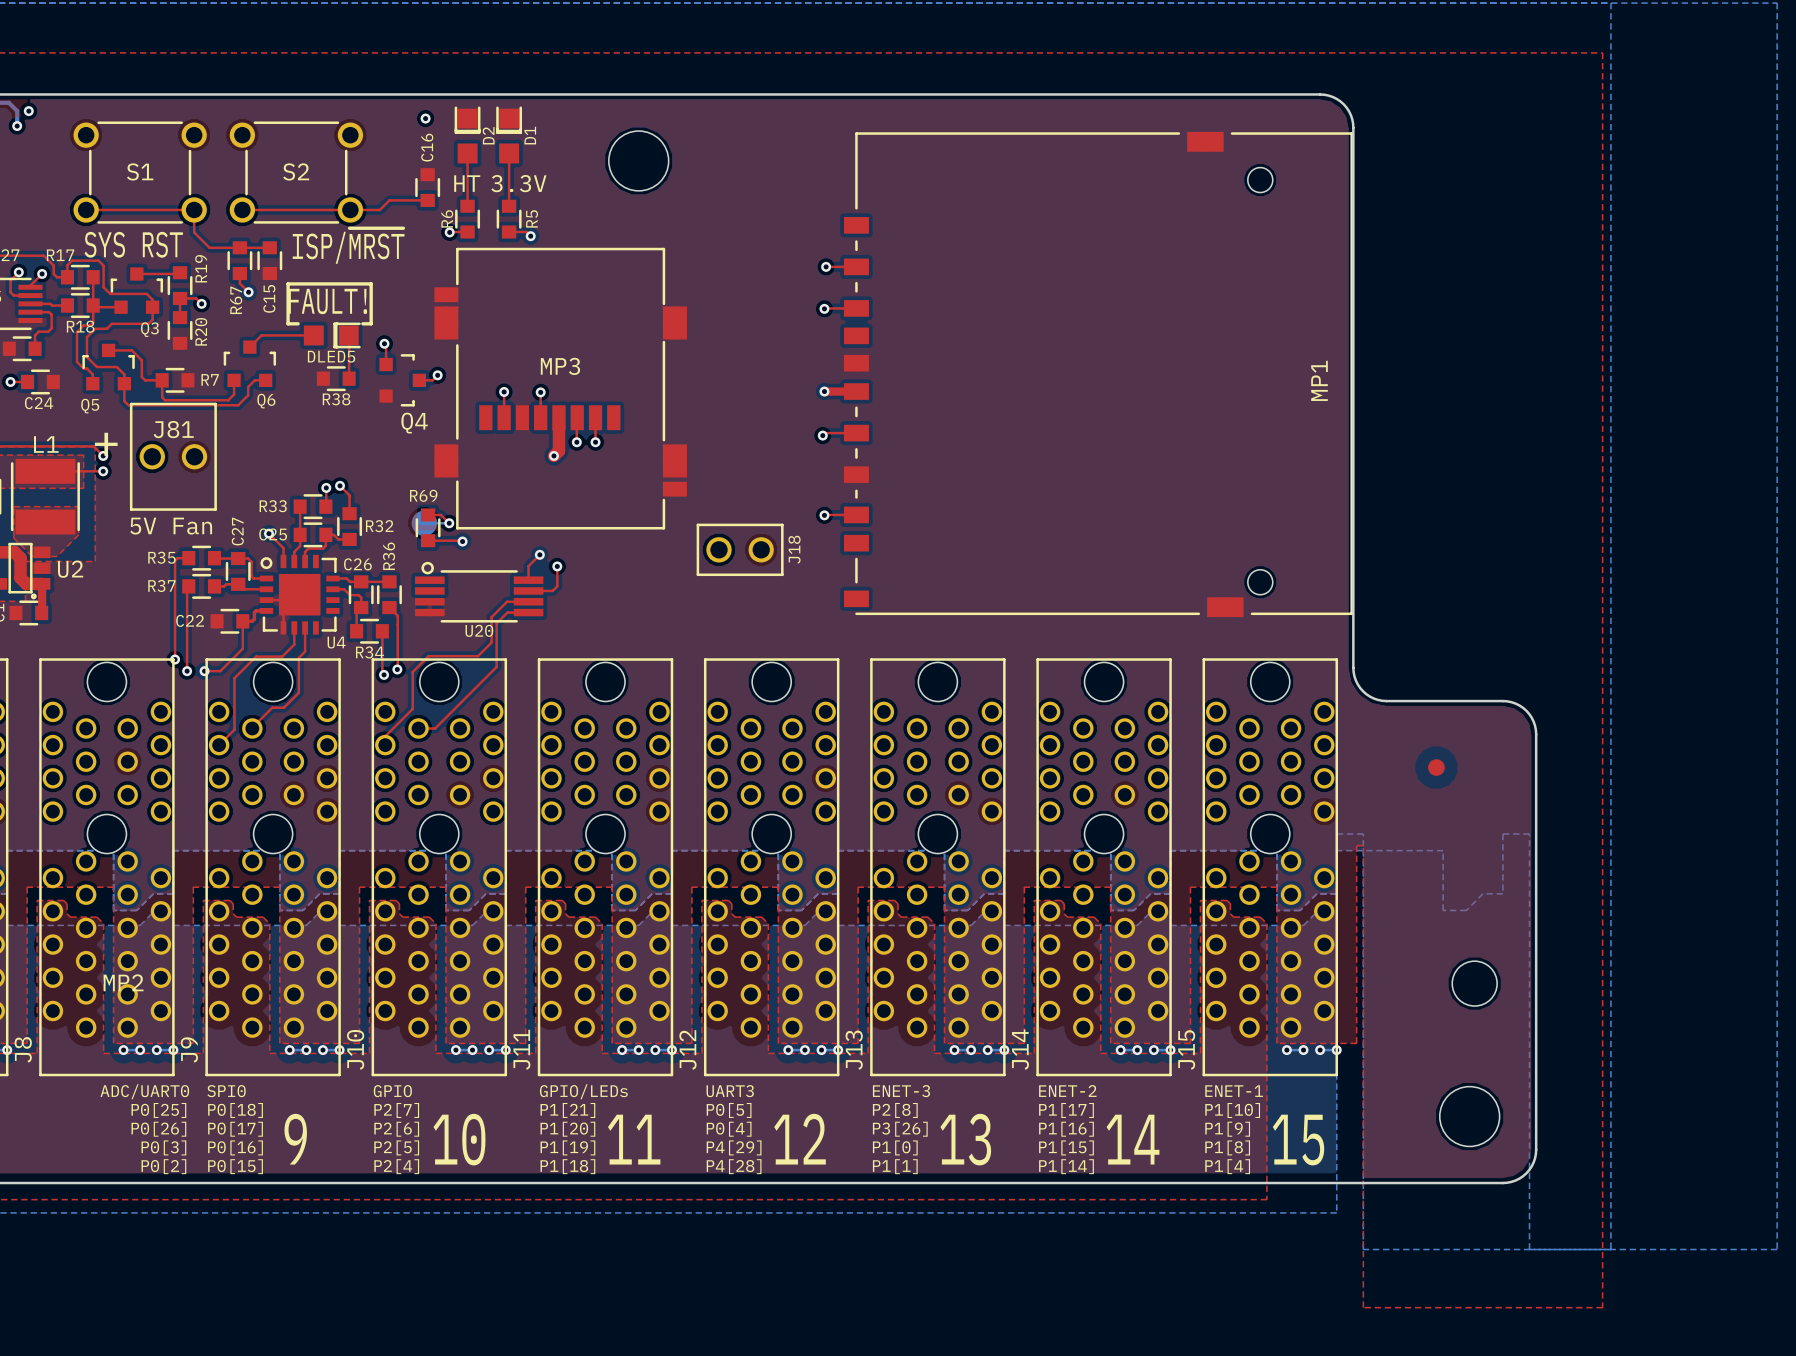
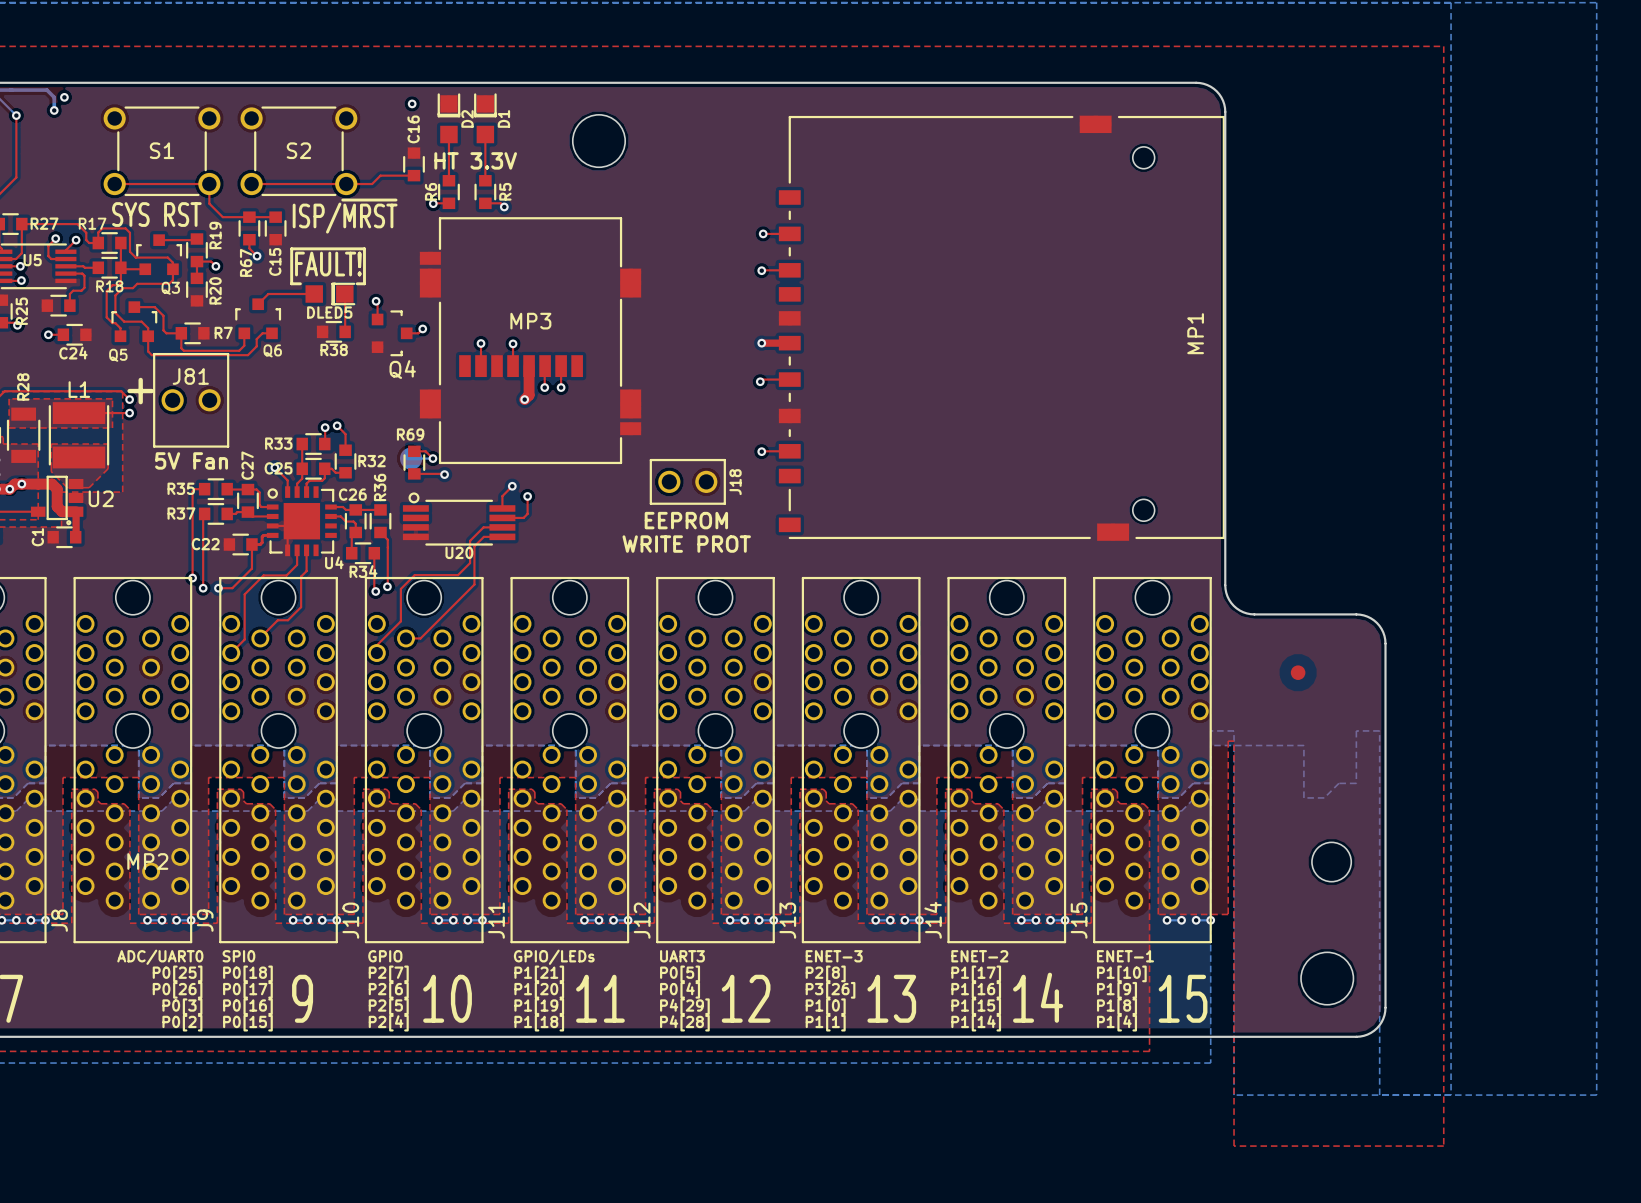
text: none -> EEPROM (686, 520)
text: none -> WRITE PROT (686, 544)

